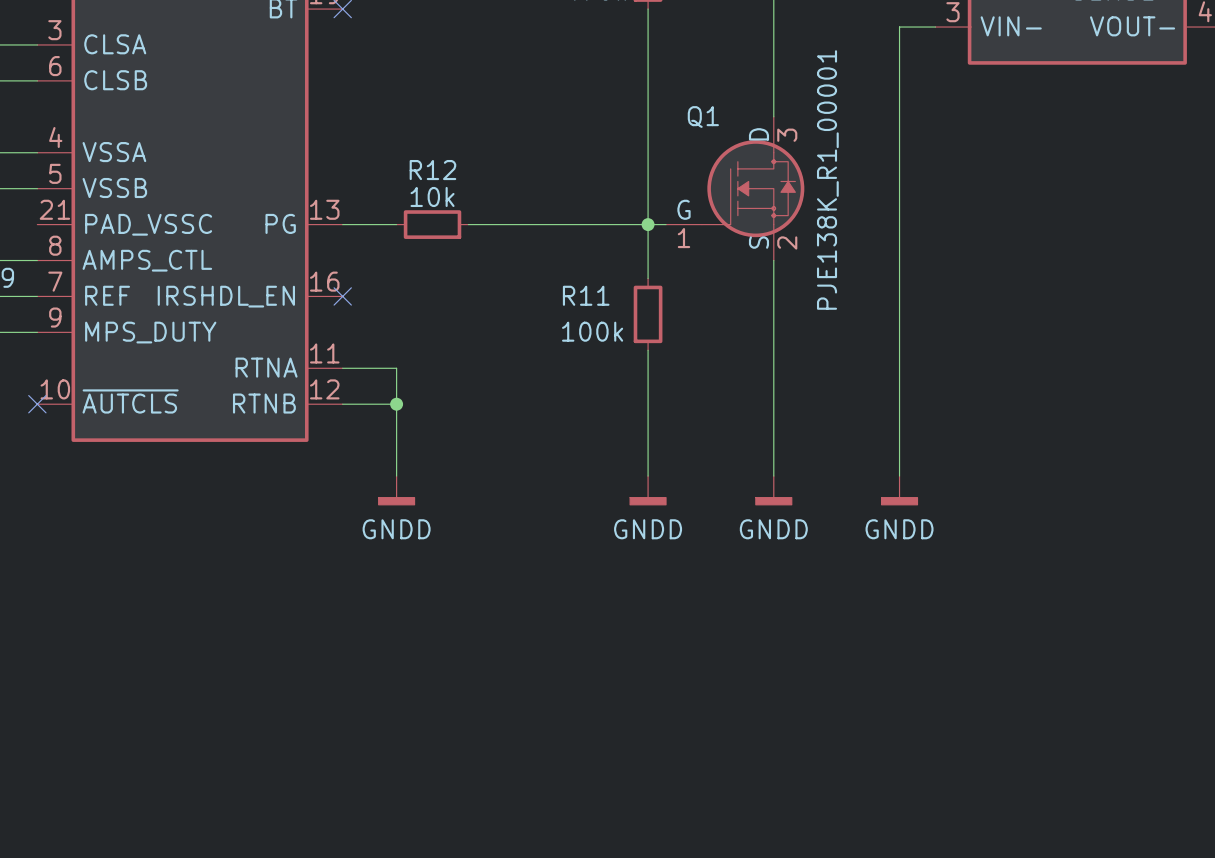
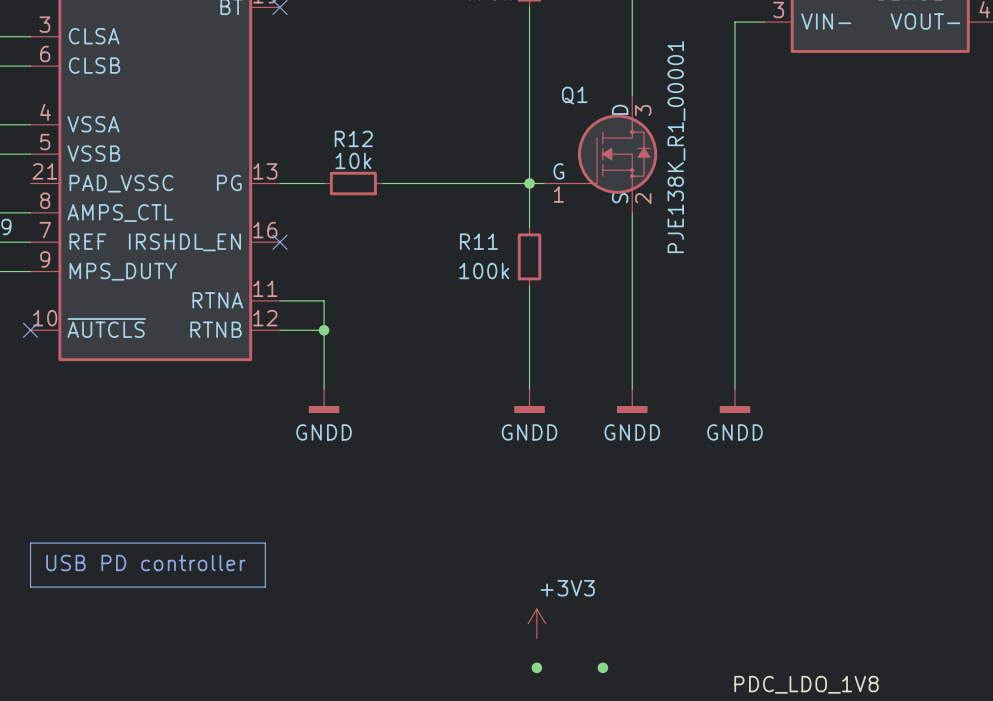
line: none -> (30, 543) (265, 543) (265, 587) (30, 587) (30, 543)
text: none -> USB PD controller (145, 563)
power symbol: none -> +3V3 (536, 623)
junction: none -> (536, 667)
junction: none -> (602, 667)
label: none -> PDC_LDO_1V8 (806, 684)

